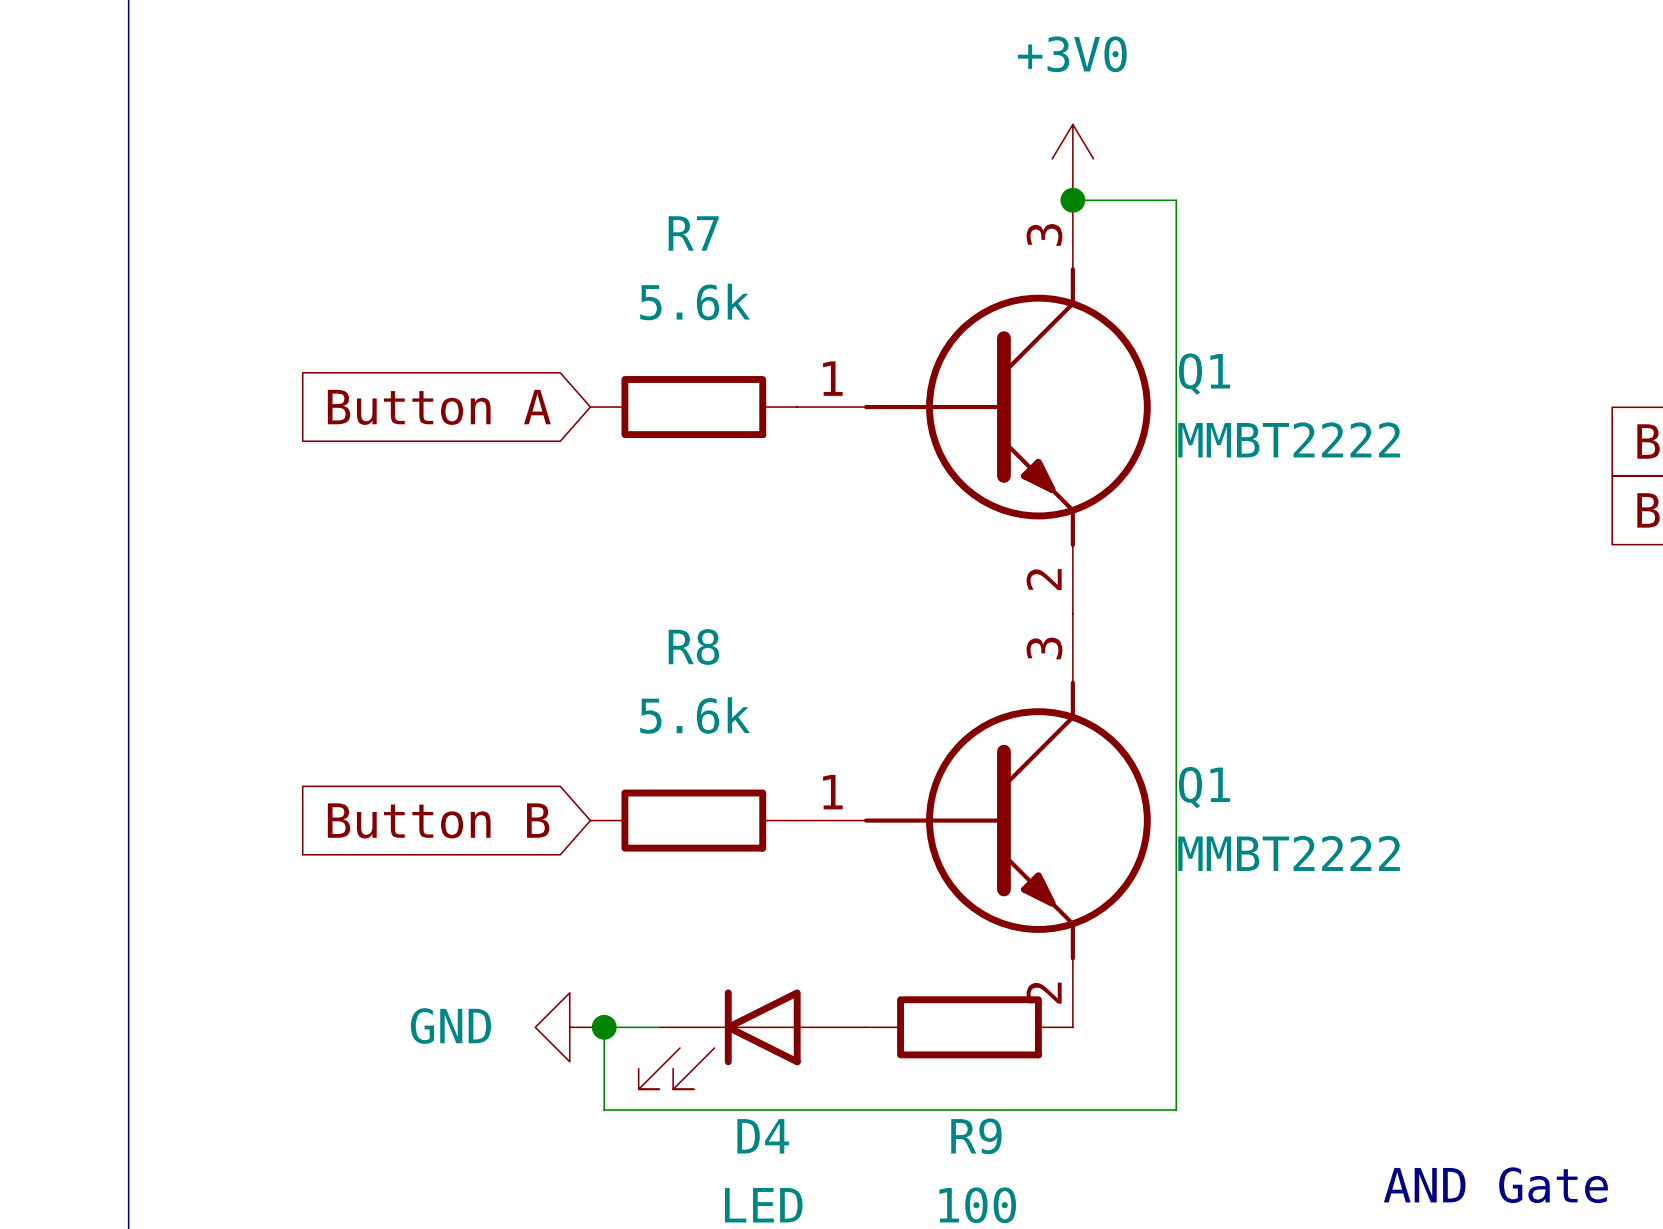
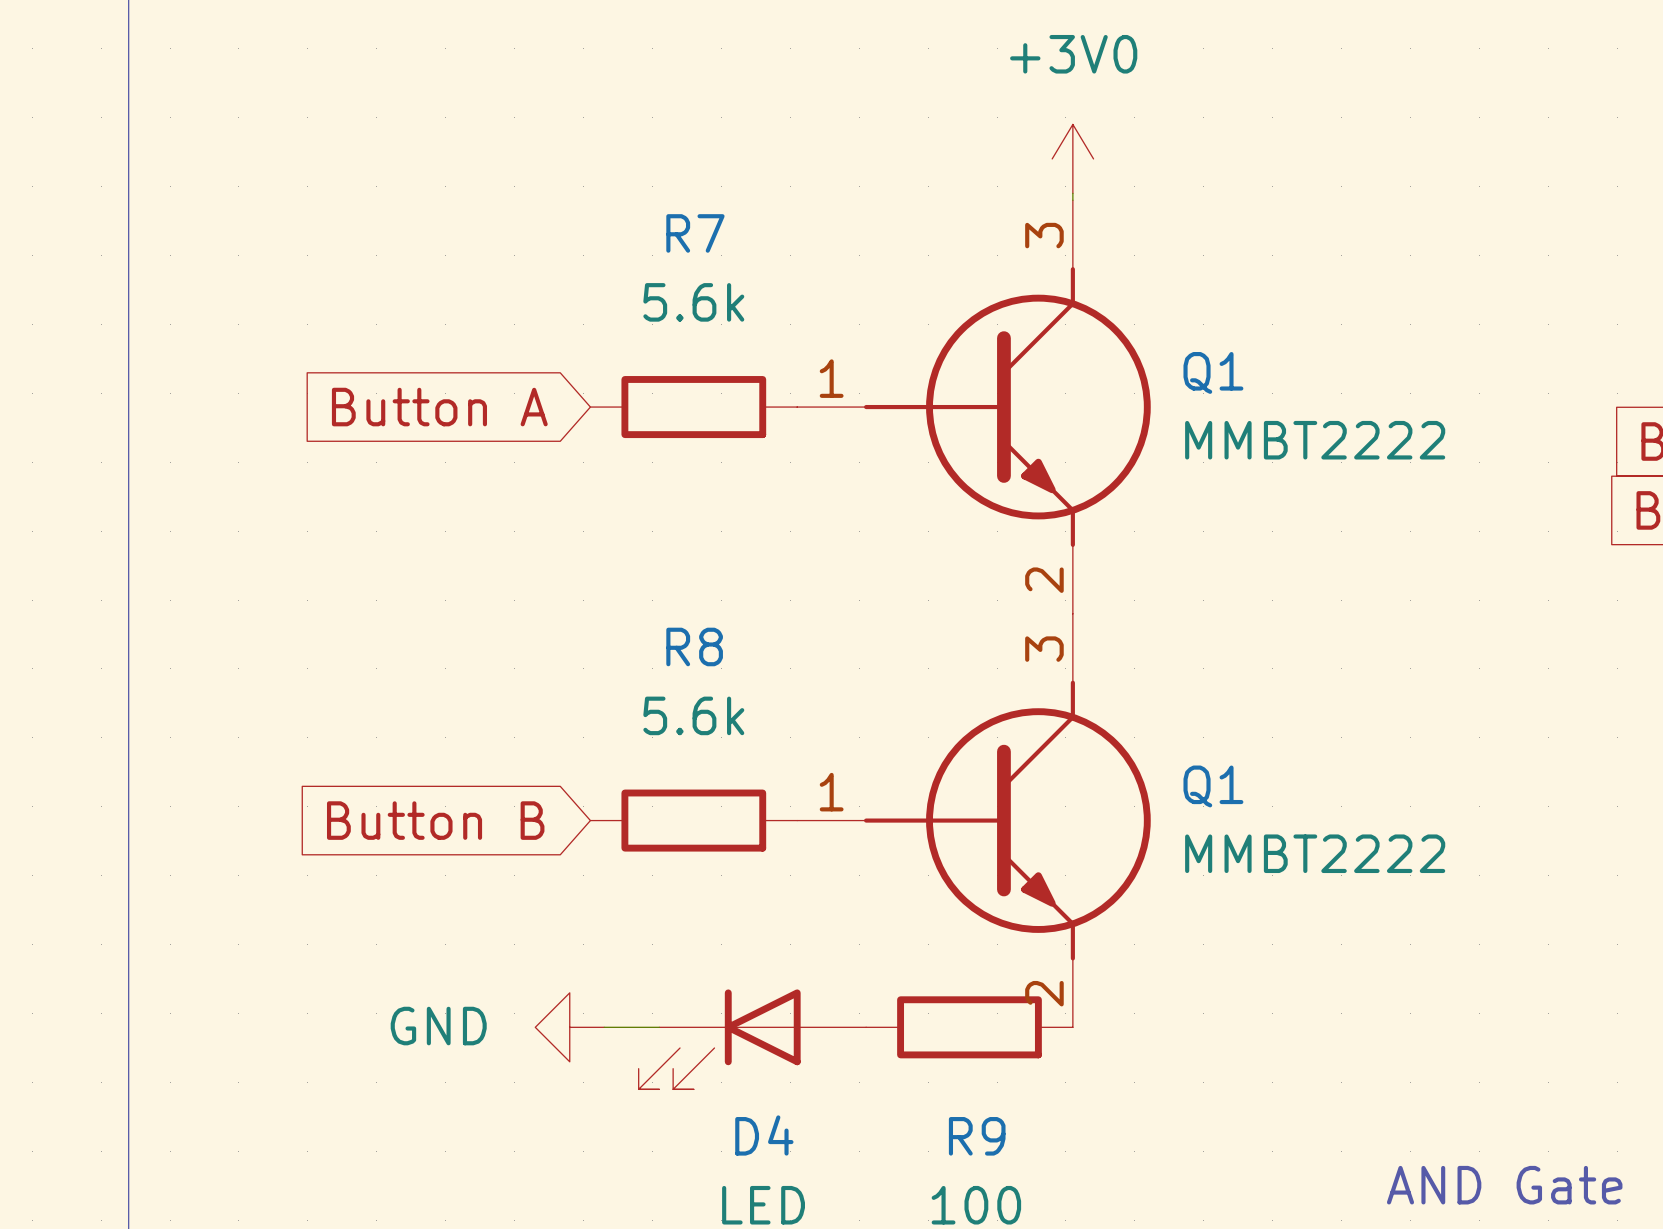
wire: (1072, 200) (1176, 200) (1176, 1110) (604, 1110) (604, 1027) -> none
junction: (1072, 200) -> none
junction: (604, 1027) -> none

